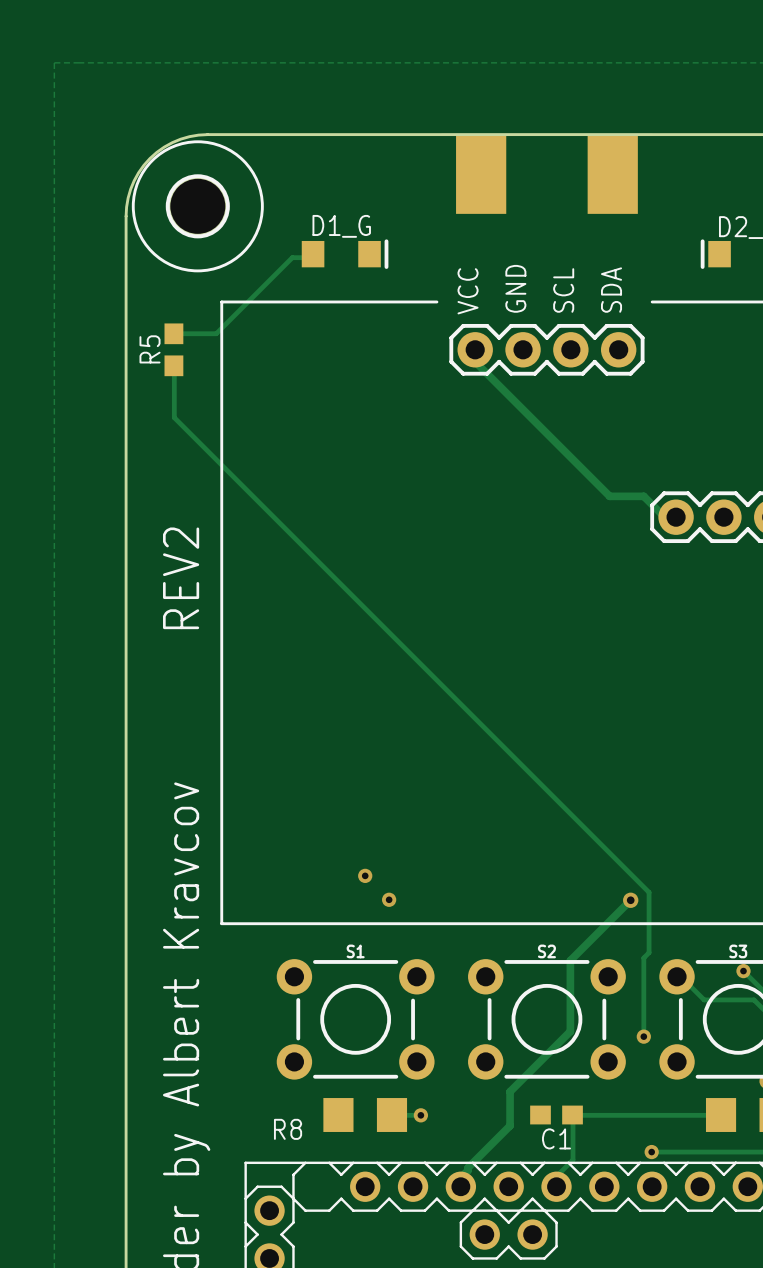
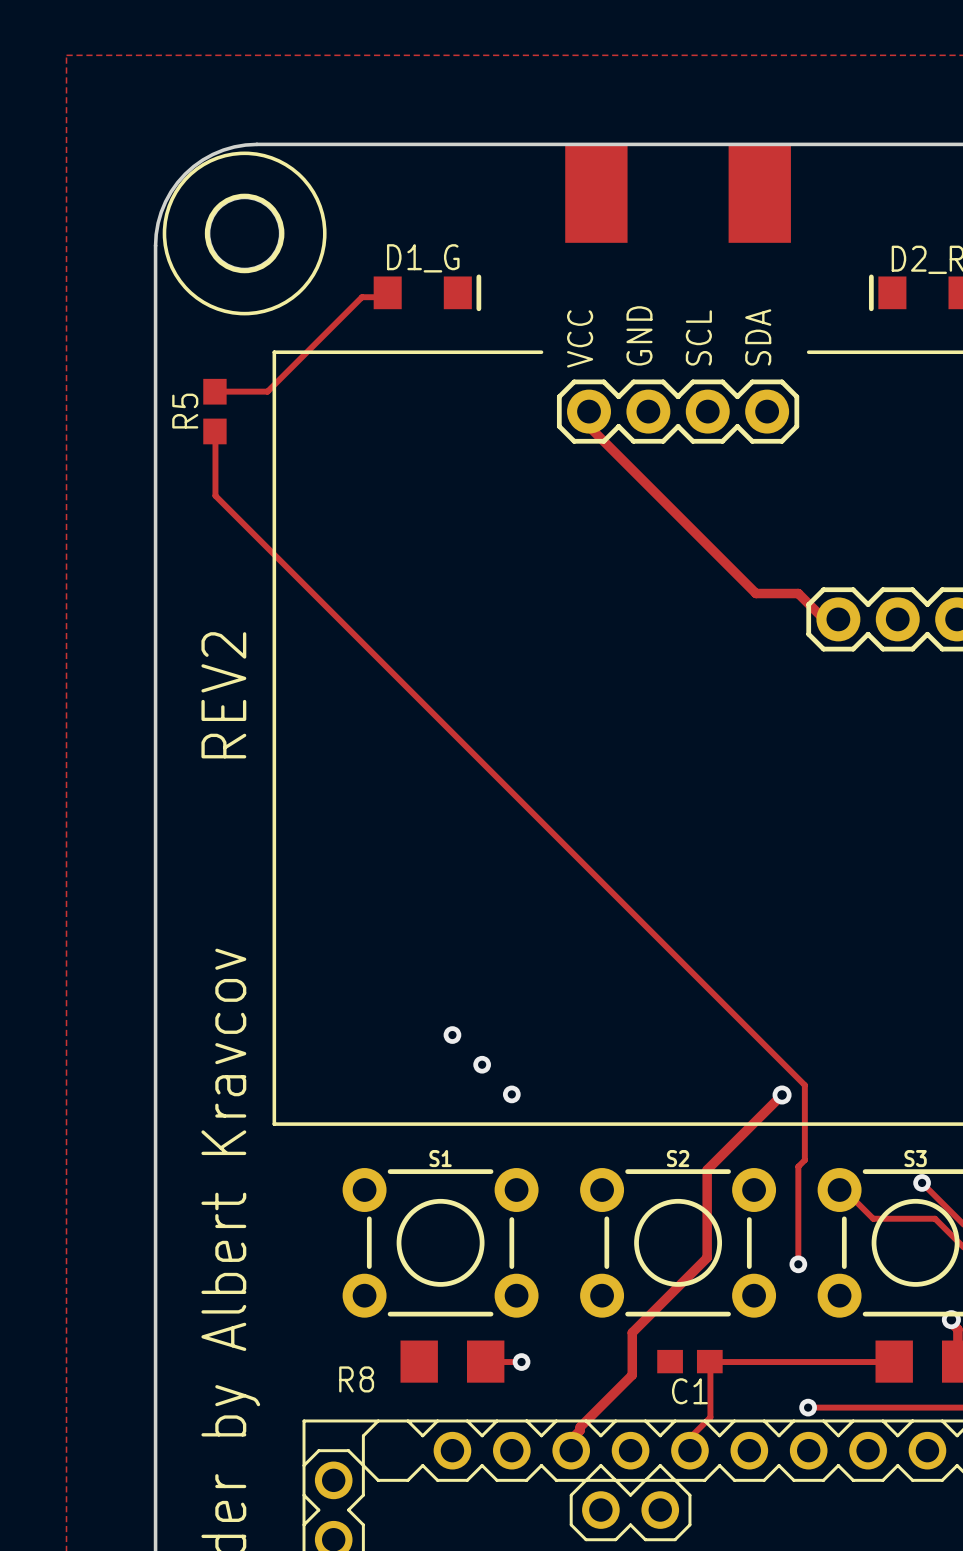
via: none -> (452, 1035)
via: (365, 875) -> none
via: none -> (482, 1064)
via: (389, 899) -> none
via: none -> (511, 1094)

